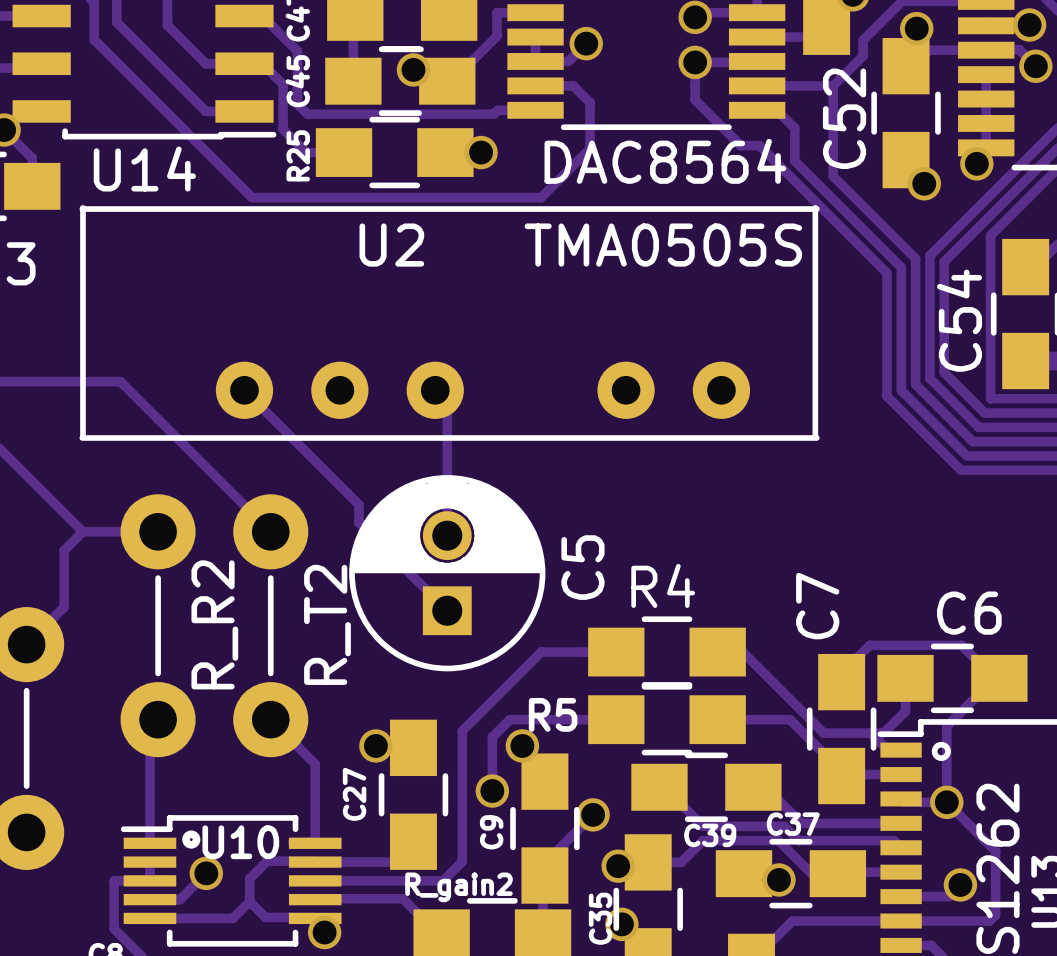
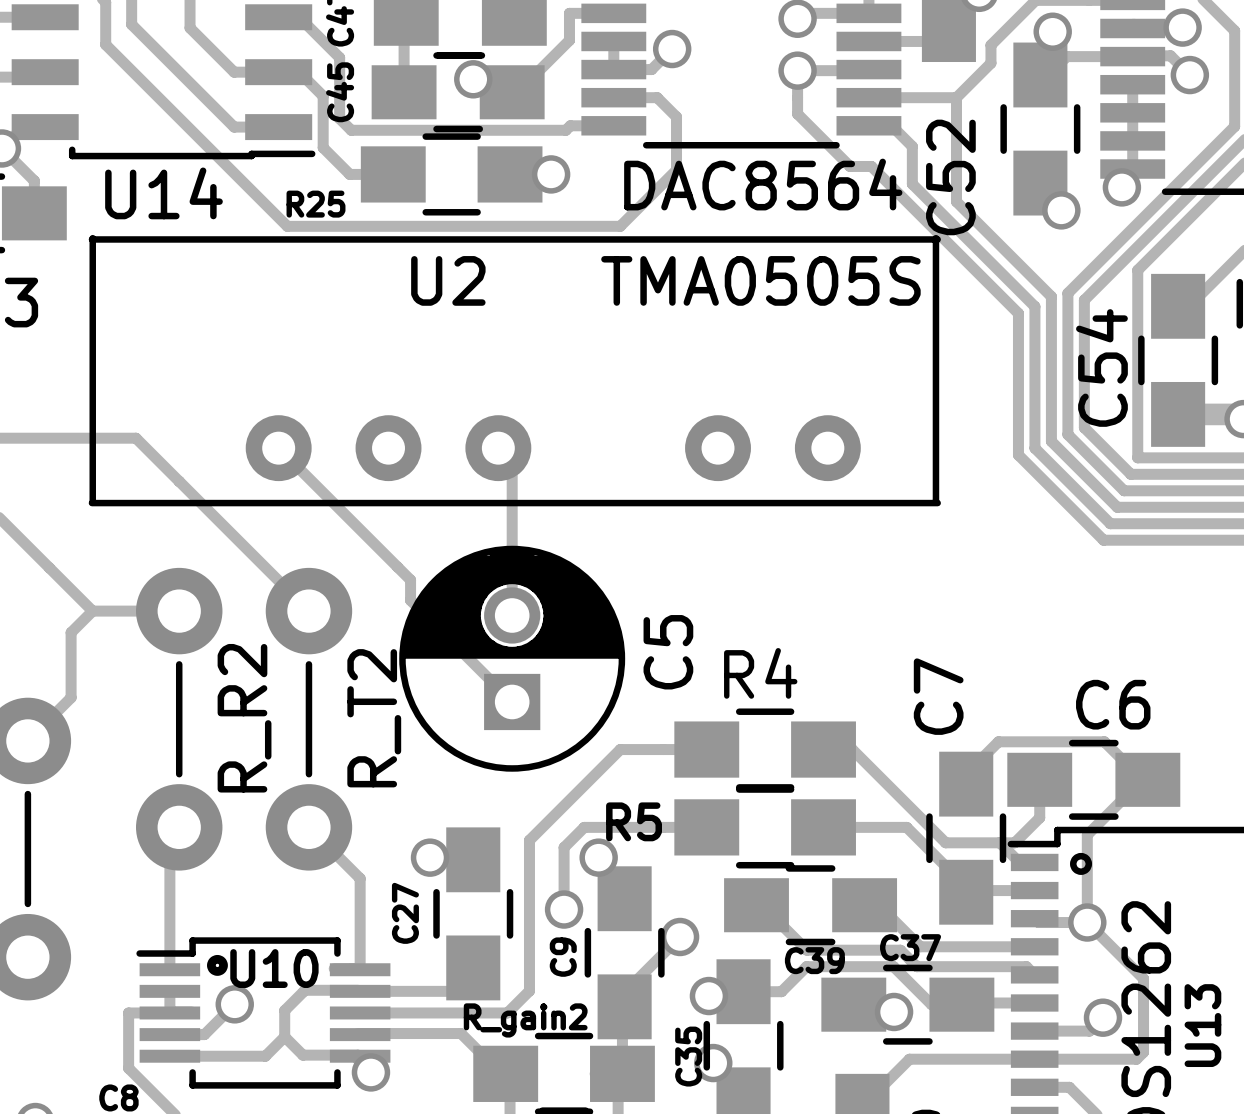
C52 name position: C52 (844, 118) -> C52 (950, 177)
R25 name rotation: 0° (298, 155) -> 90° clockwise (315, 204)

